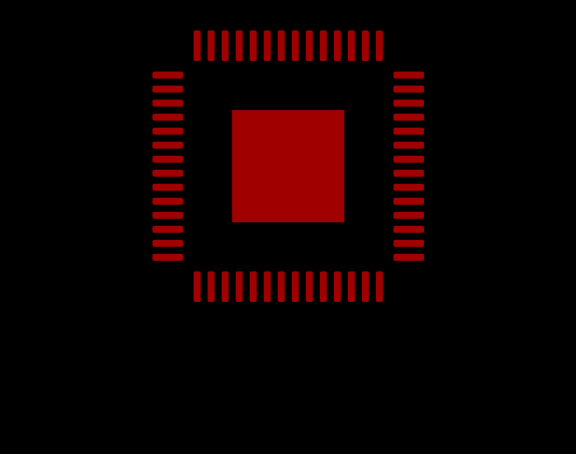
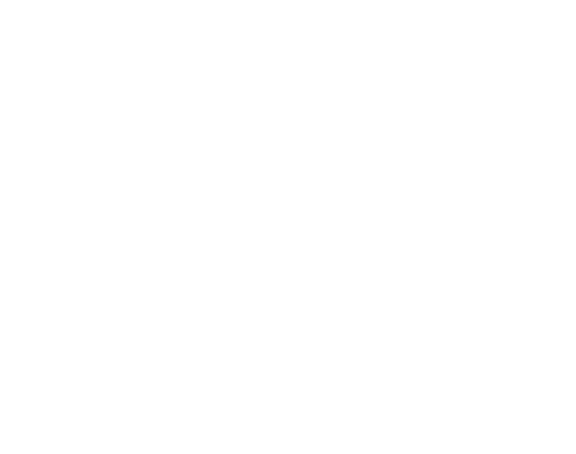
part: (288, 166) -> none

